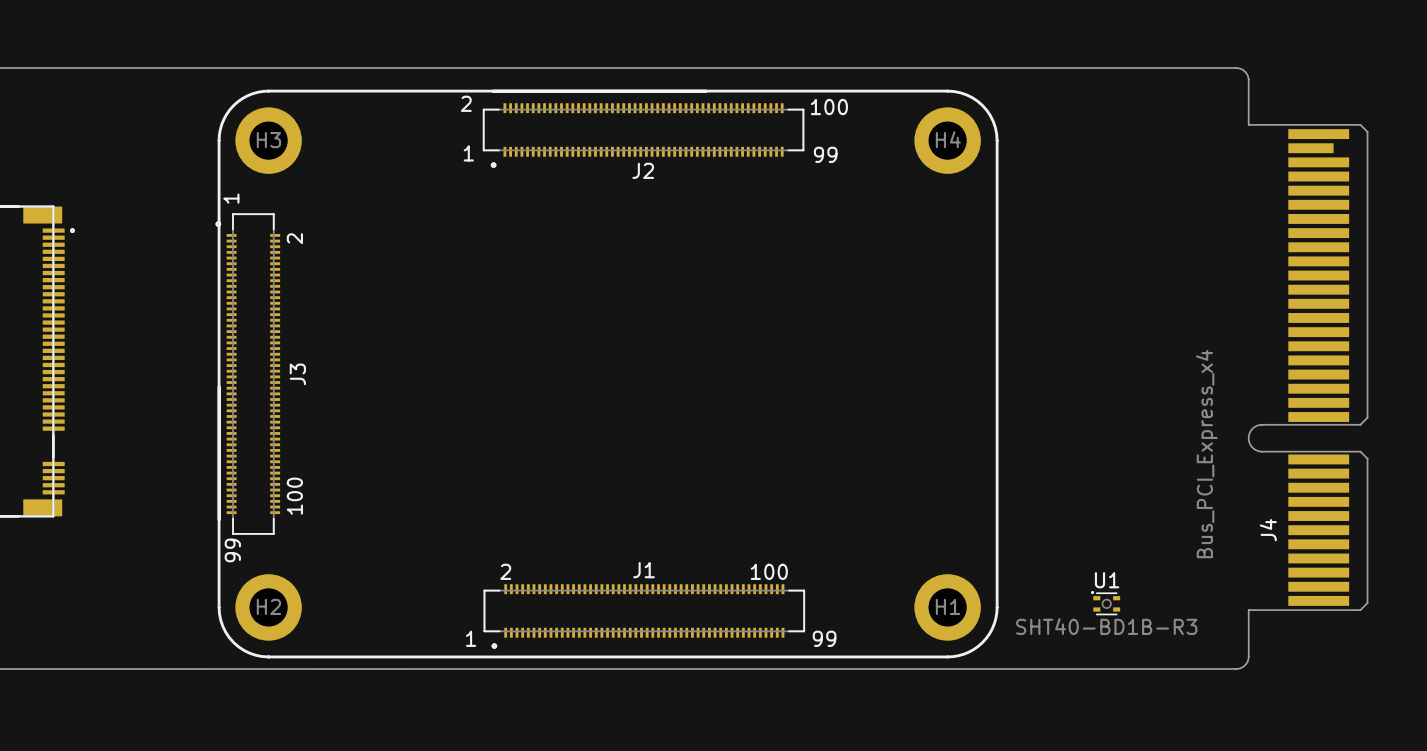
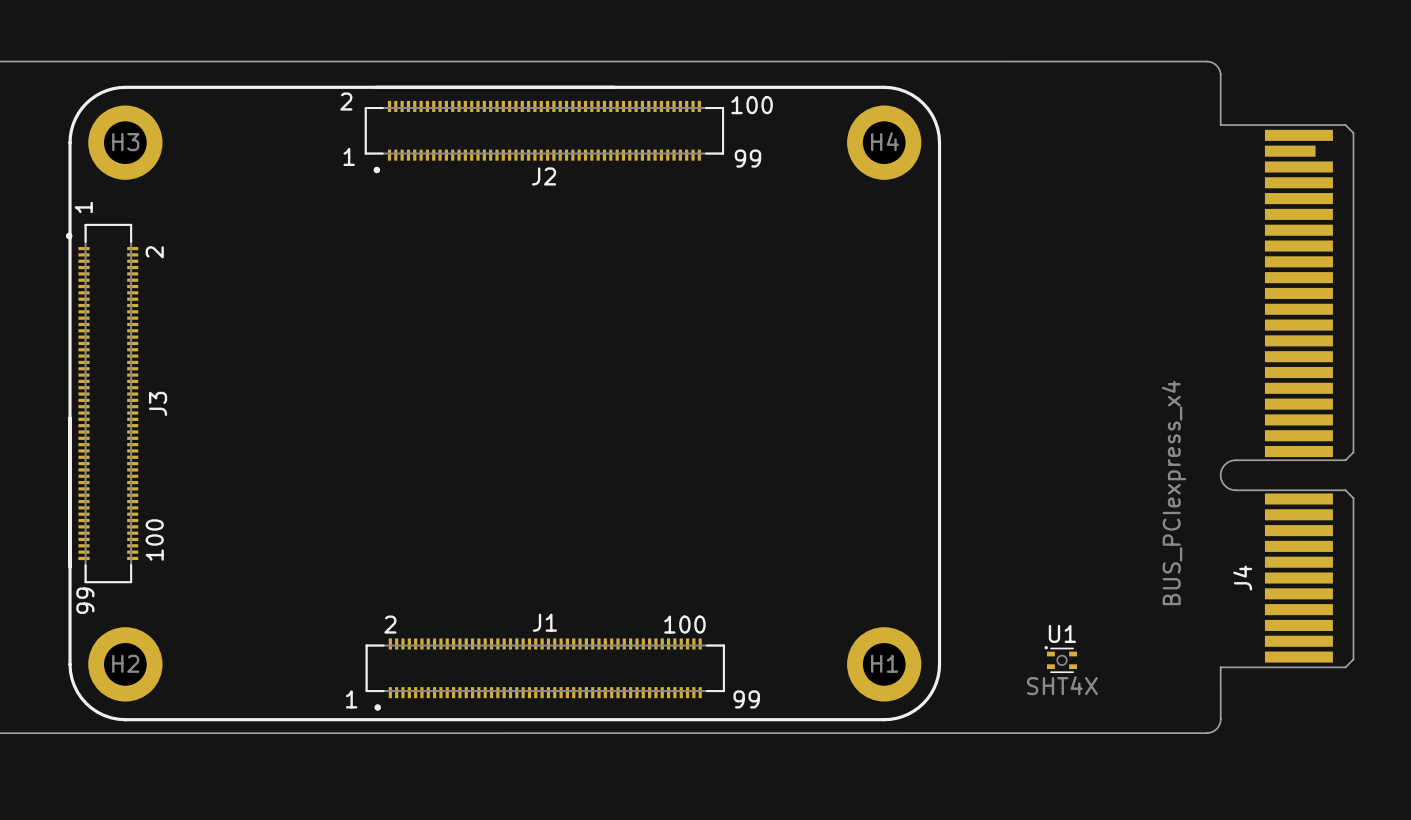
J4 value: Bus_PCI_Express_x4 (1206, 454) -> BUS_PCIexpress_x4 (1173, 493)
U1 value: SHT40-BD1B-R3 (1106, 626) -> SHT4X (1062, 685)

